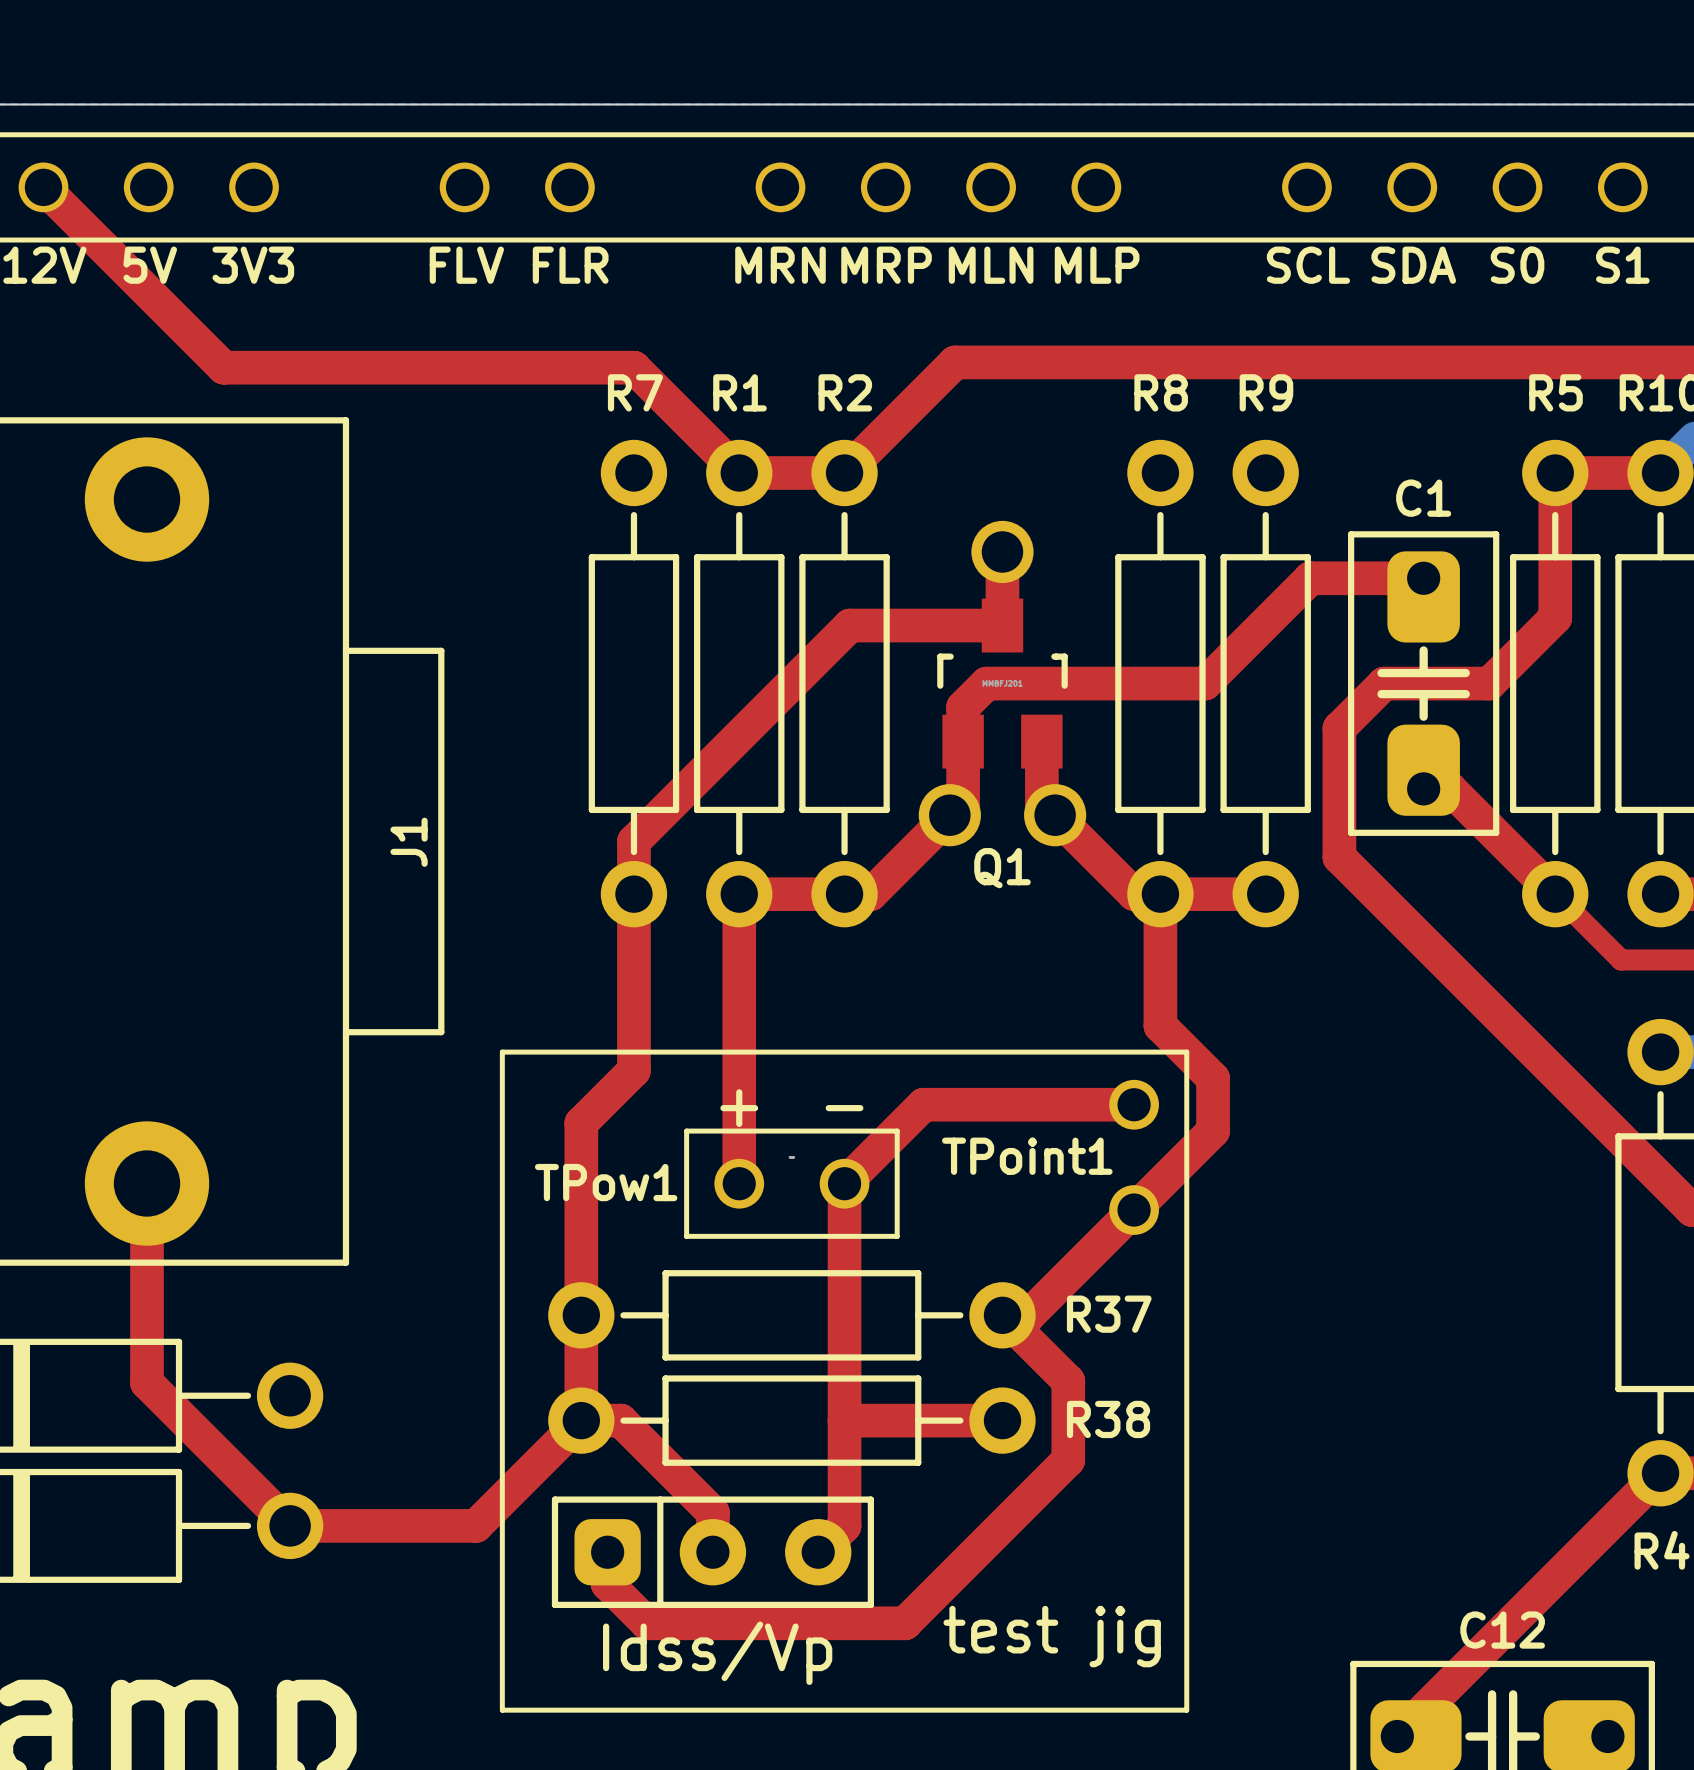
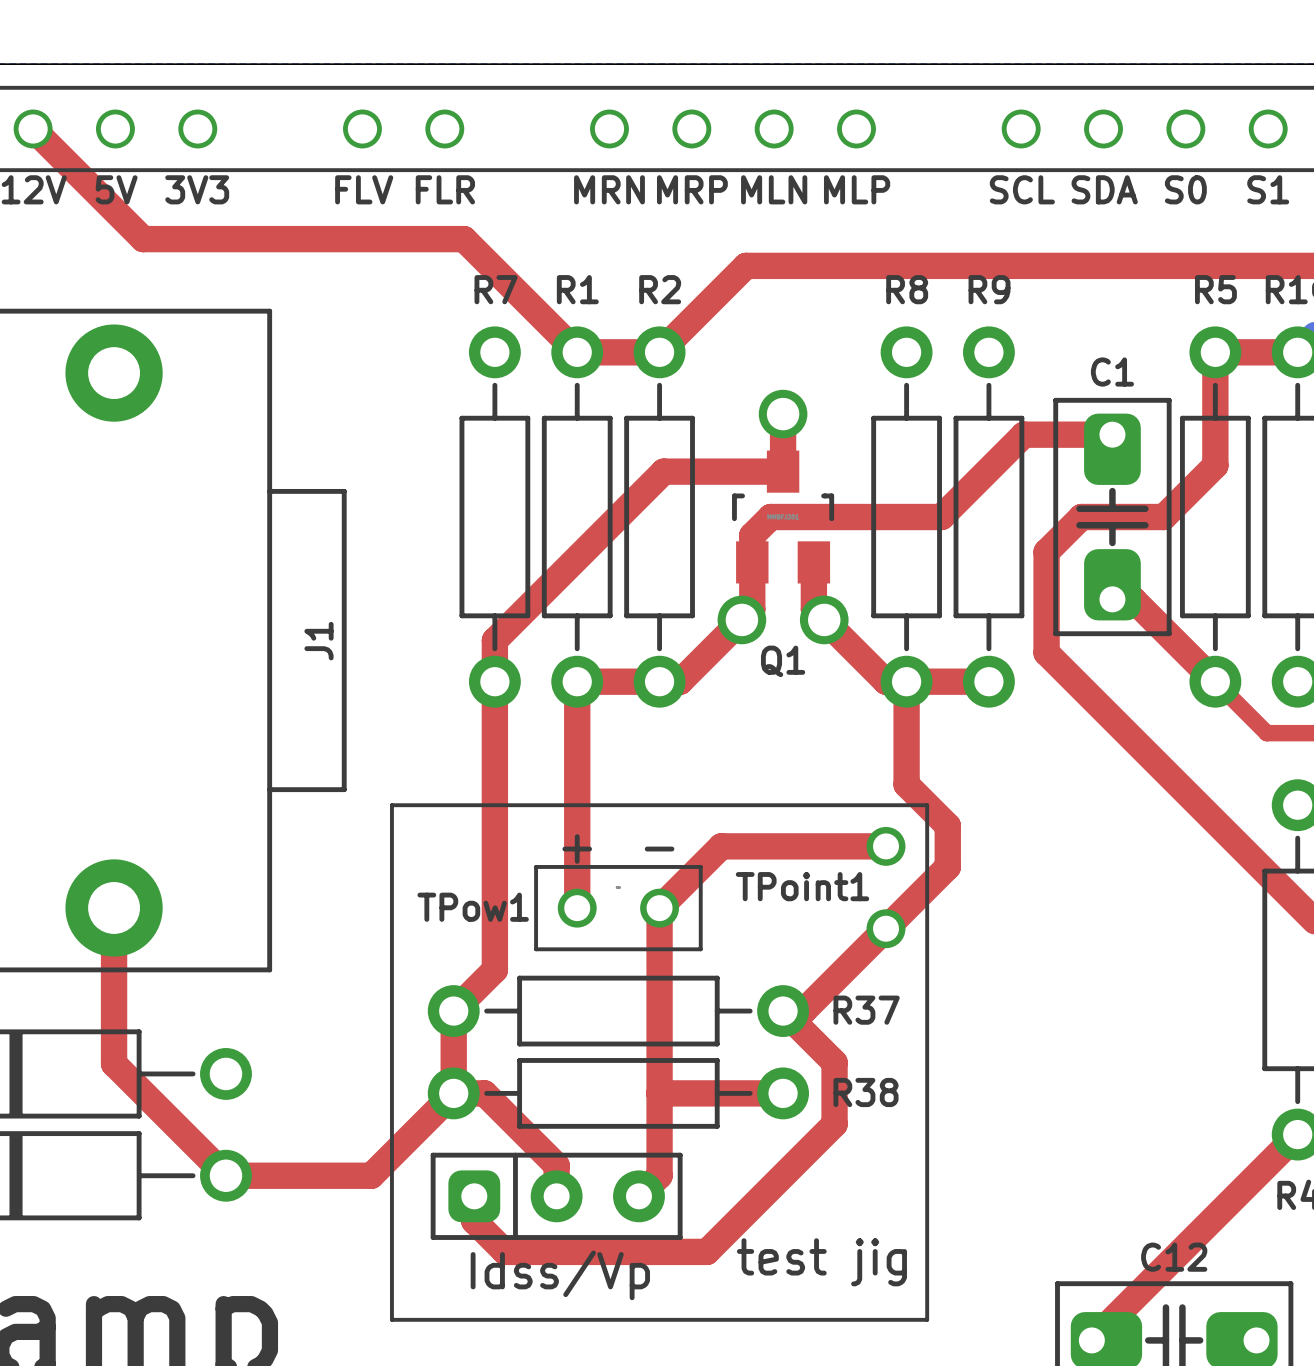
top track: (184, 328) (223, 367) (633, 367) -> (143, 239) (464, 239) (494, 269)
top track: (633, 1070) (581, 1123) (581, 1315) -> (494, 819) (494, 969) (453, 1011)

